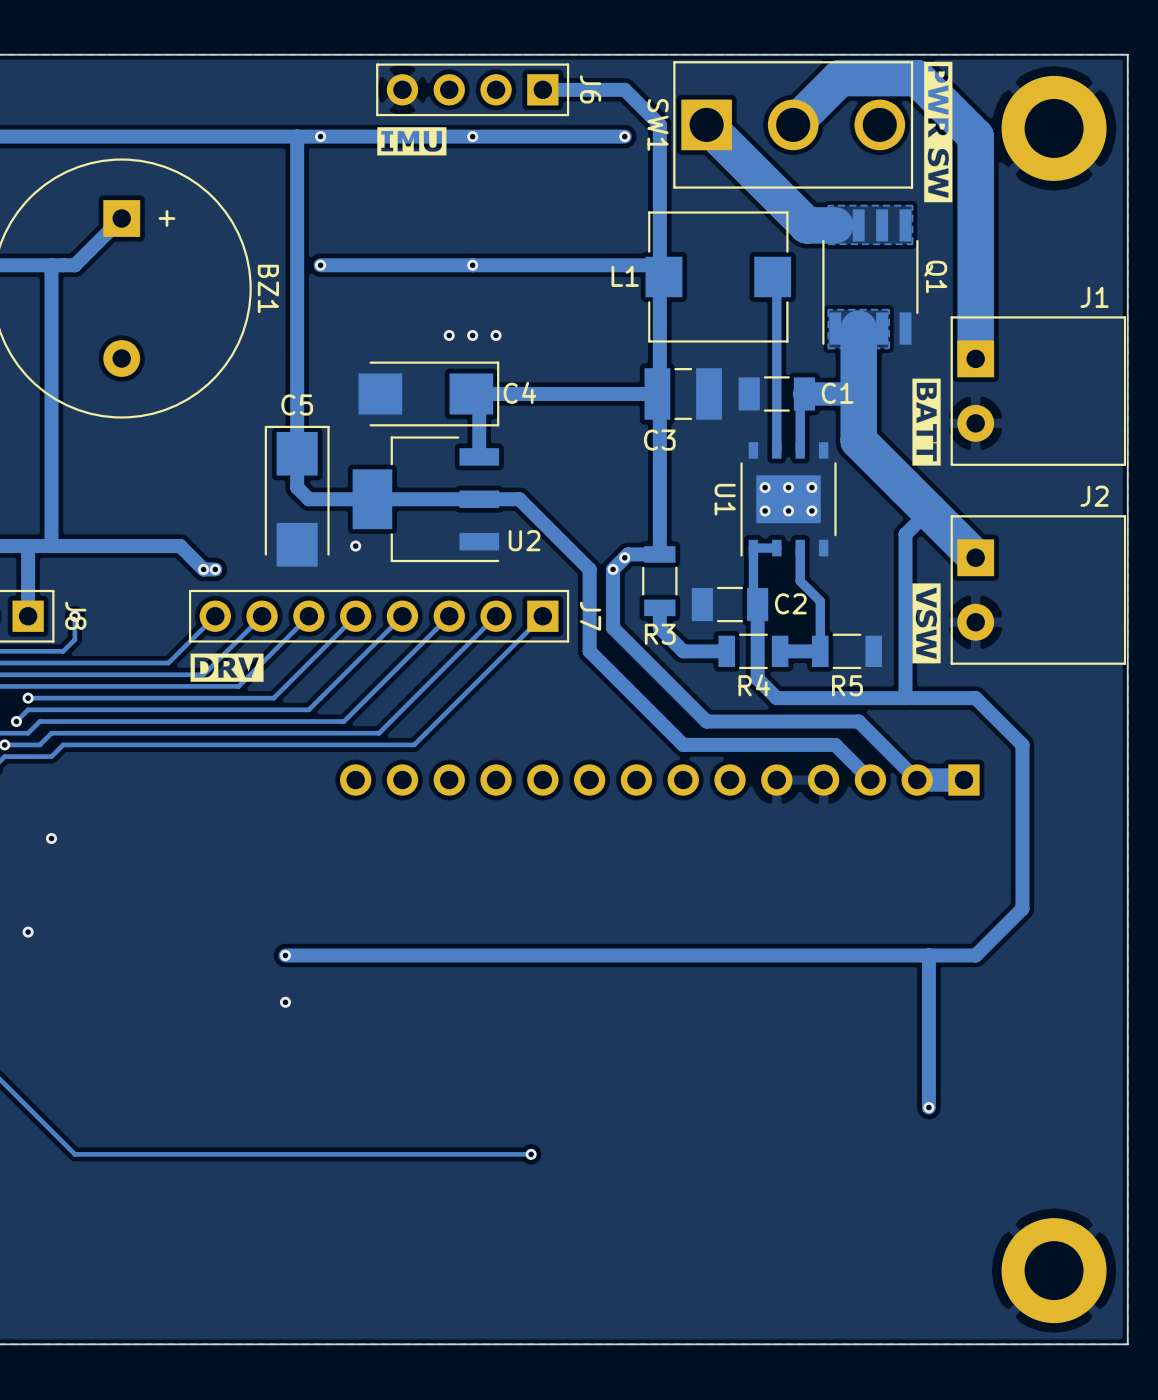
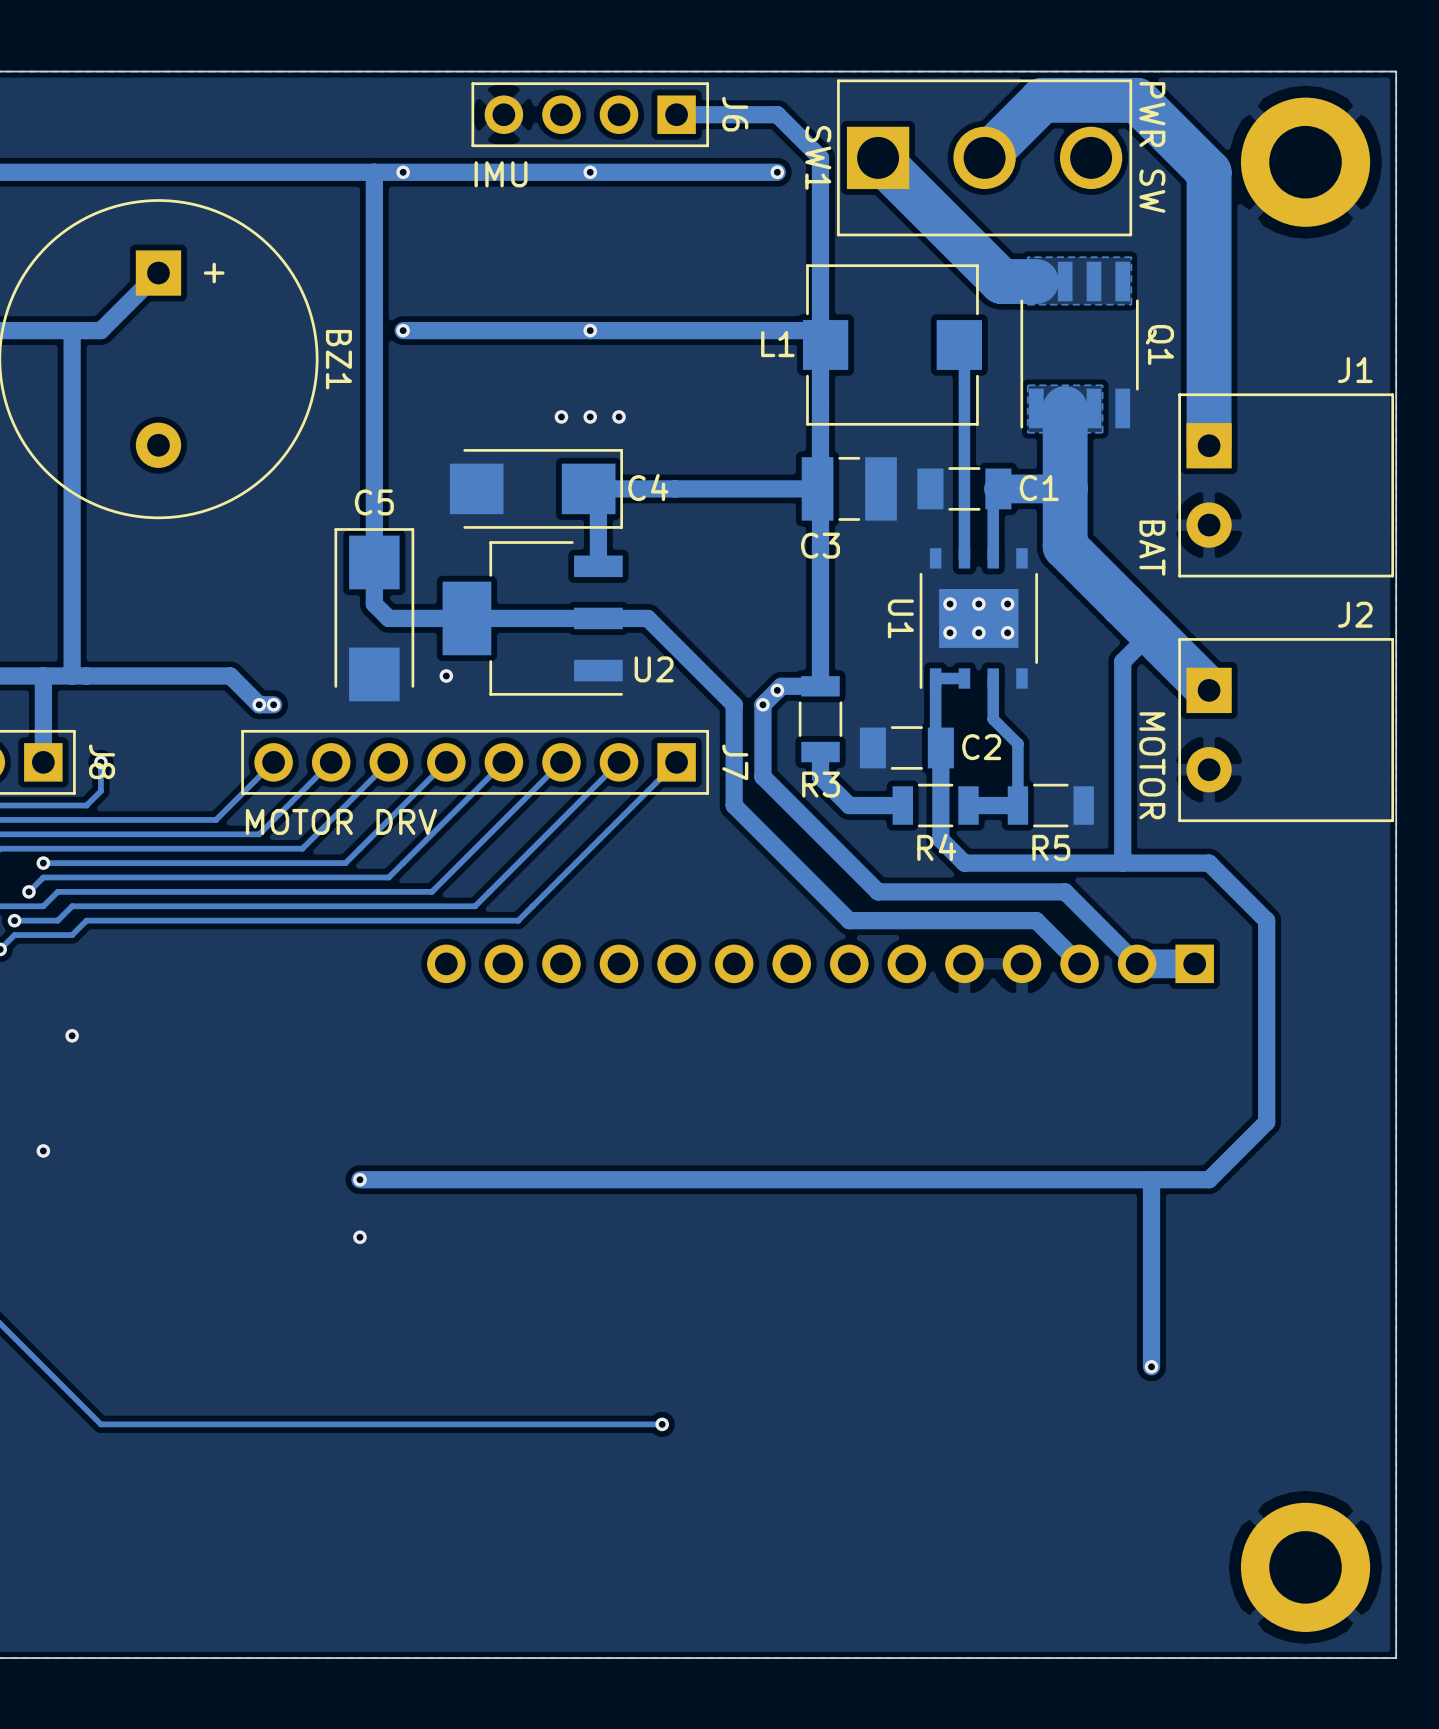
drawing: [924, 61, 953, 203] -> none
text: none -> PWR SW (1152, 147)
drawing: [377, 127, 447, 156] -> none
text: none -> IMU (501, 174)
drawing: [912, 378, 941, 466] -> none
text: none -> BAT (1152, 548)
drawing: [912, 583, 941, 664] -> none
text: none -> MOTOR (1152, 765)
drawing: [190, 653, 264, 682] -> none
text: none -> MOTOR DRV (341, 821)

